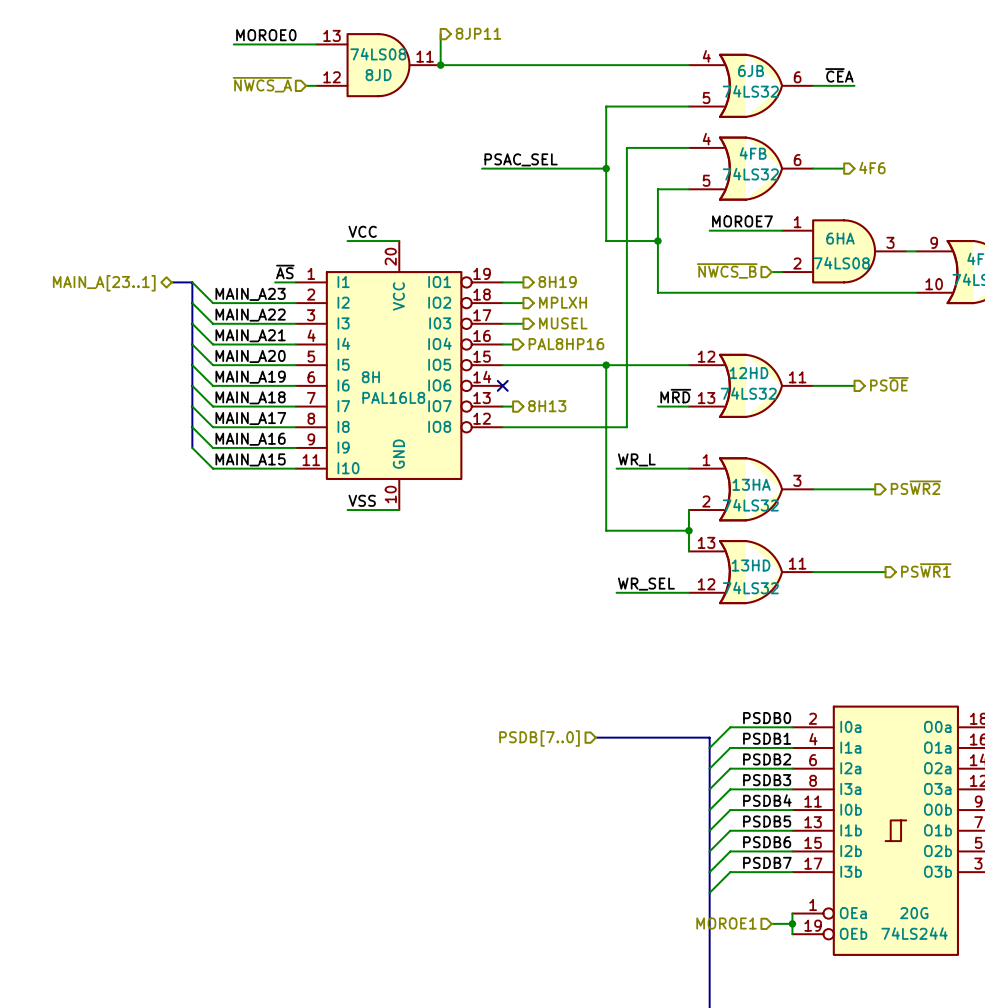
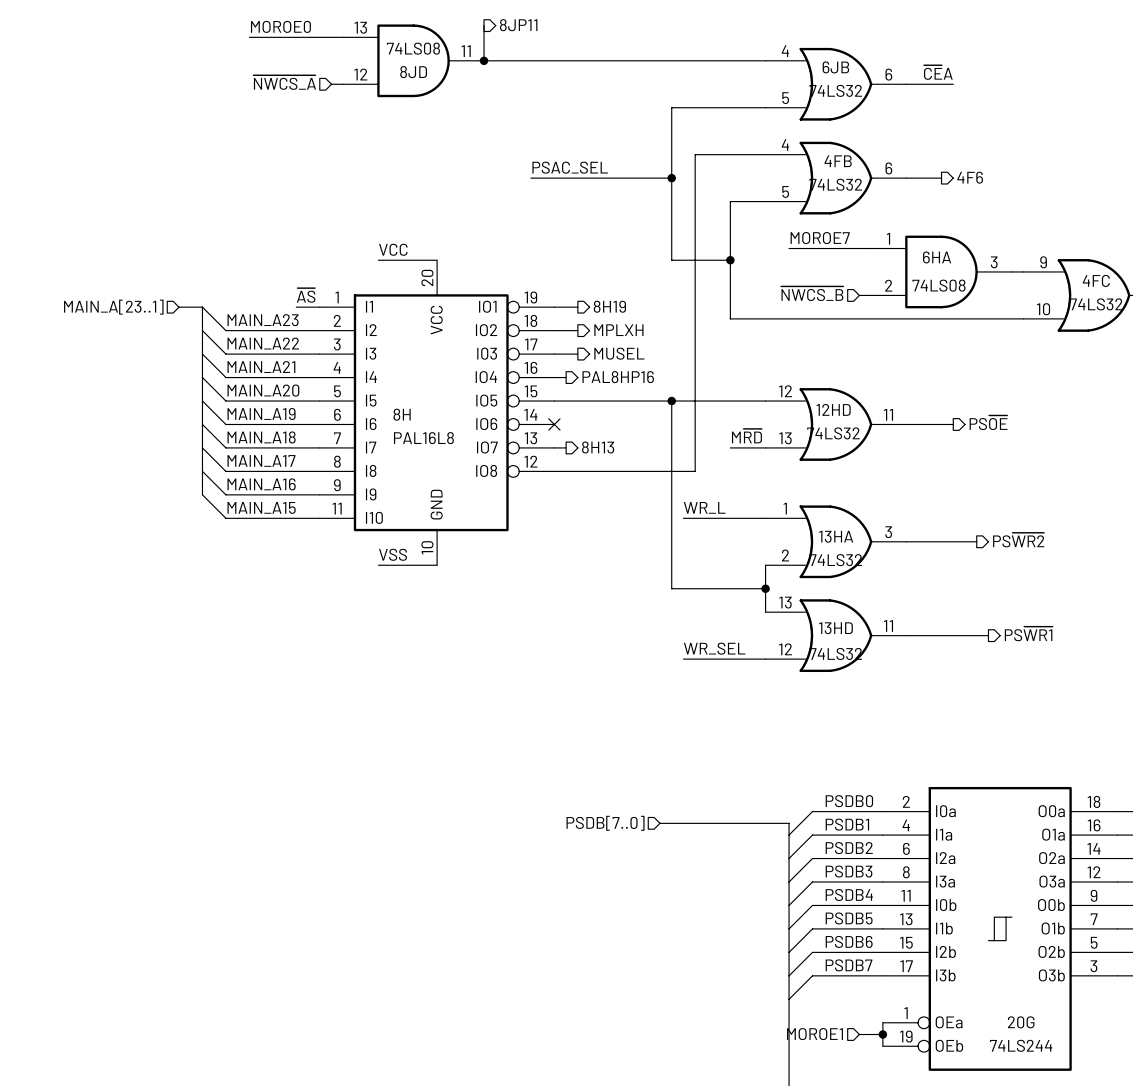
hierarchical label shape: bidirectional (104, 283) -> input (113, 307)

